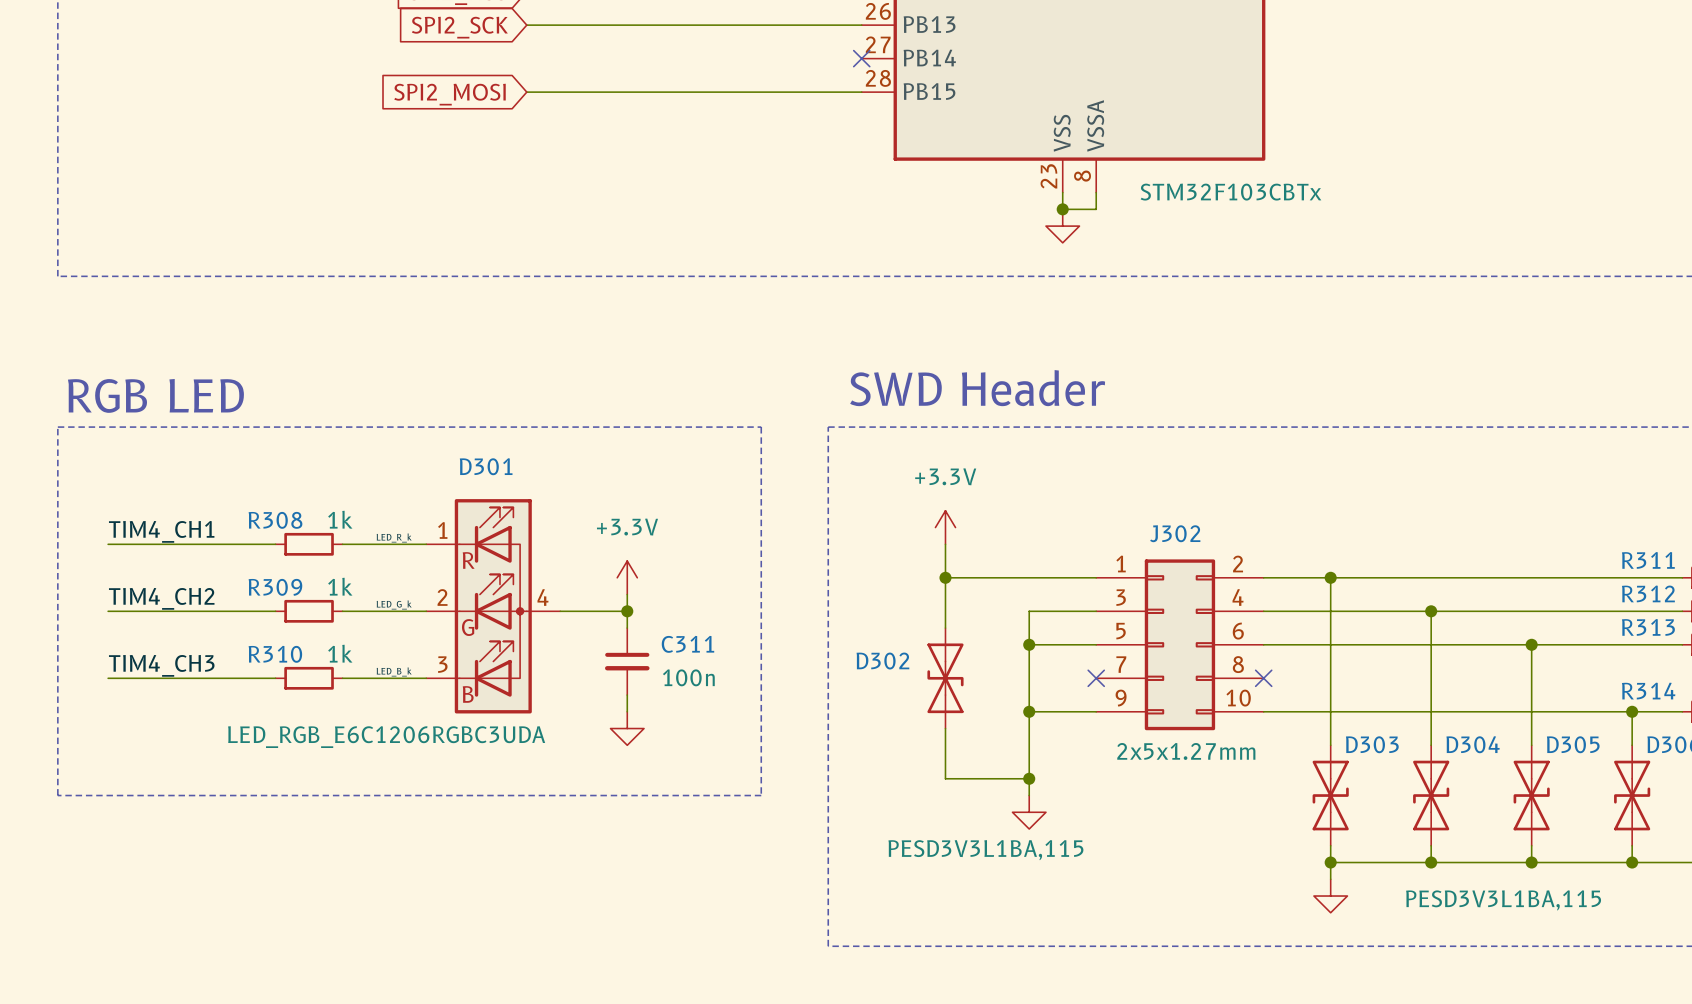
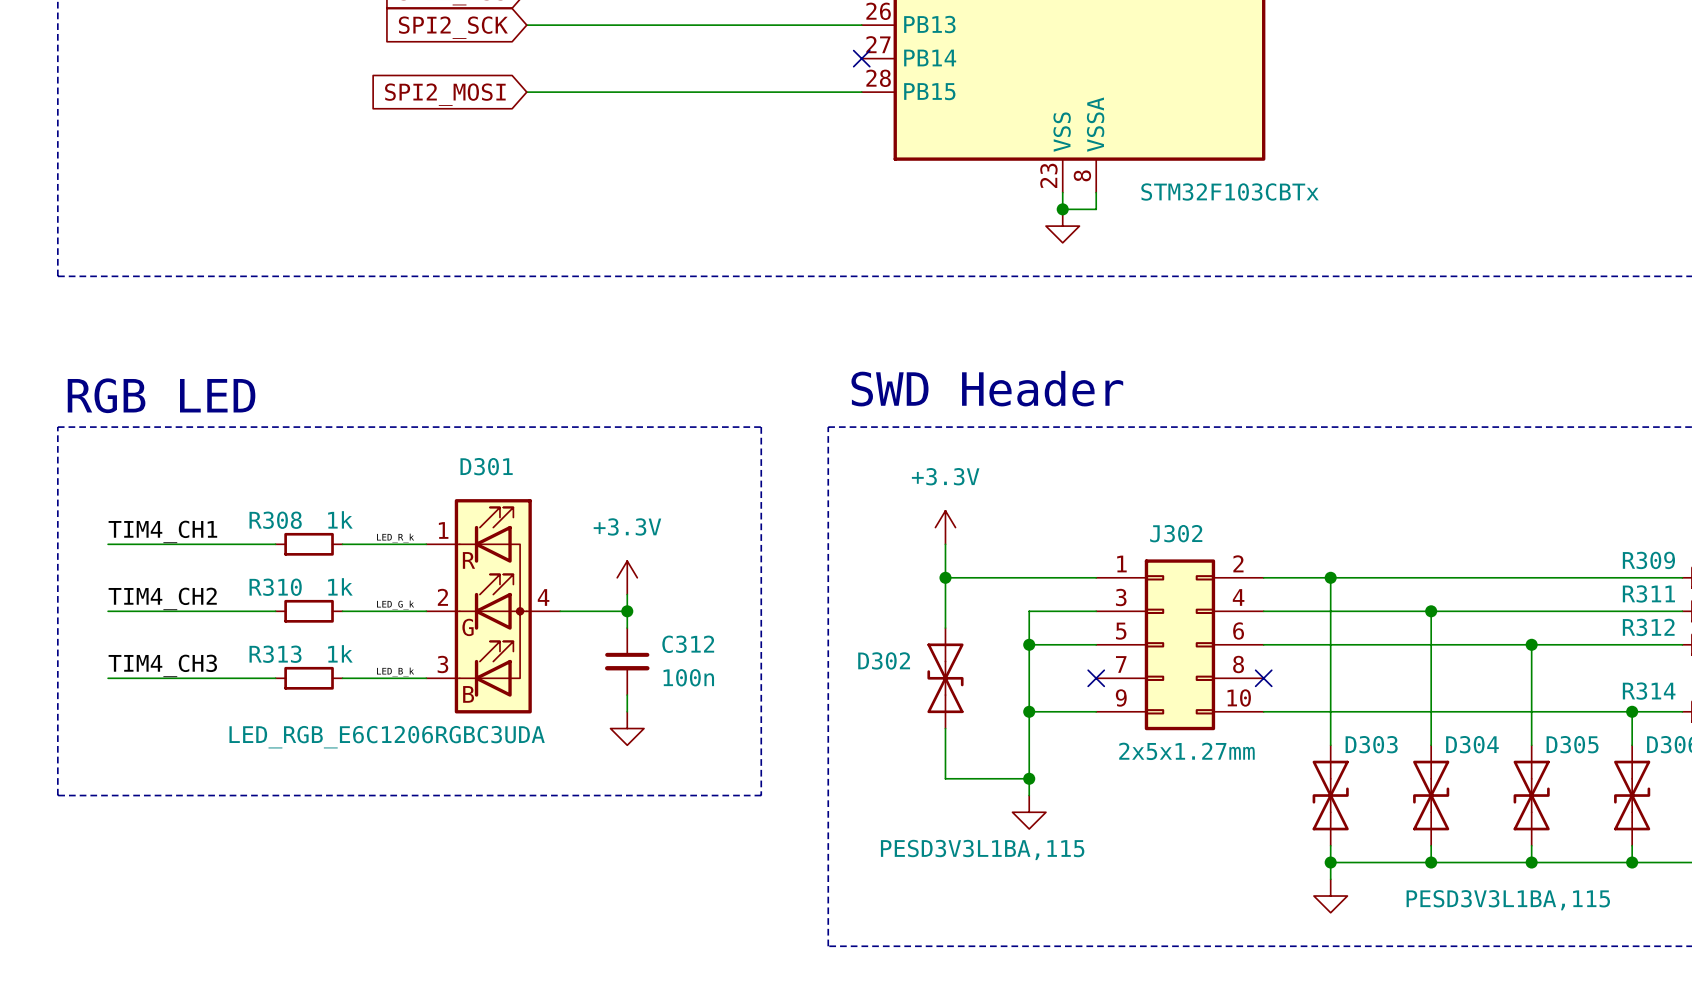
R311 name: R311 (1648, 560) -> R309 (1648, 560)
R309 name: R309 (275, 587) -> R310 (275, 587)
R312 name: R312 (1648, 593) -> R311 (1648, 593)
R313 name: R313 (1648, 627) -> R312 (1648, 627)
C311 name: C311 (687, 644) -> C312 (688, 644)
R310 name: R310 (275, 654) -> R313 (275, 654)

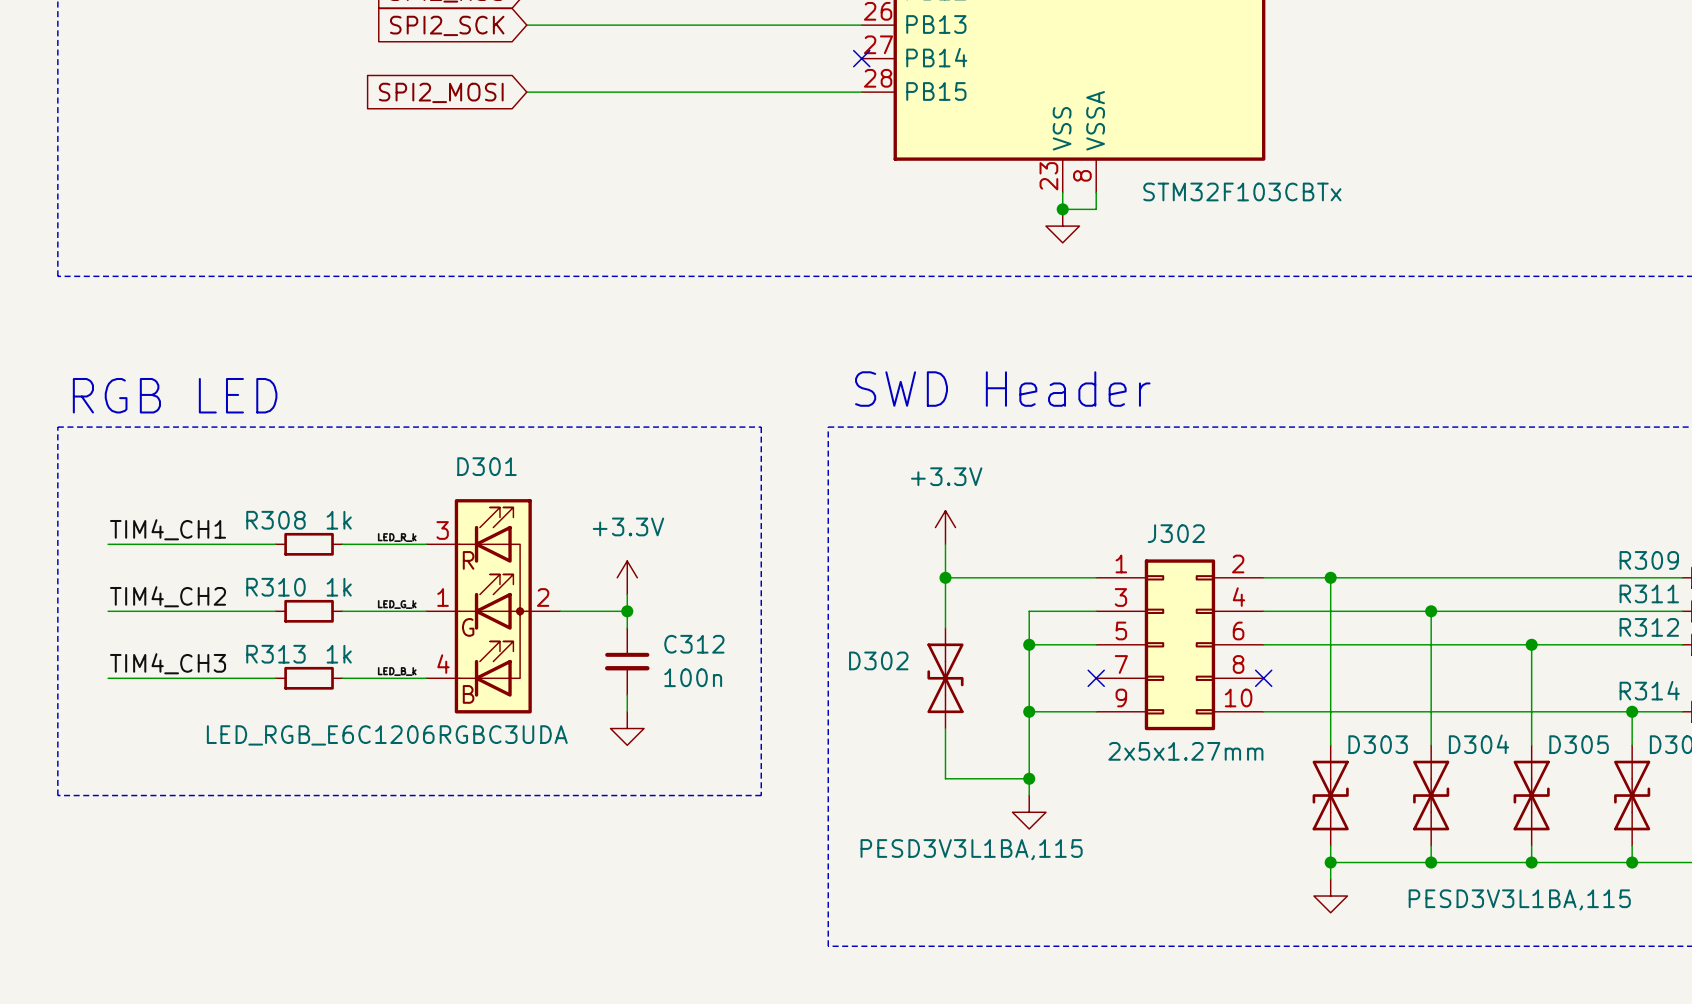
D301 pin number: 1 (443, 530) -> 3 (442, 530)
D301 pin number: 2 (442, 597) -> 1 (443, 597)
D301 pin number: 4 (543, 597) -> 2 (543, 597)
D301 pin number: 3 (442, 664) -> 4 (443, 664)

